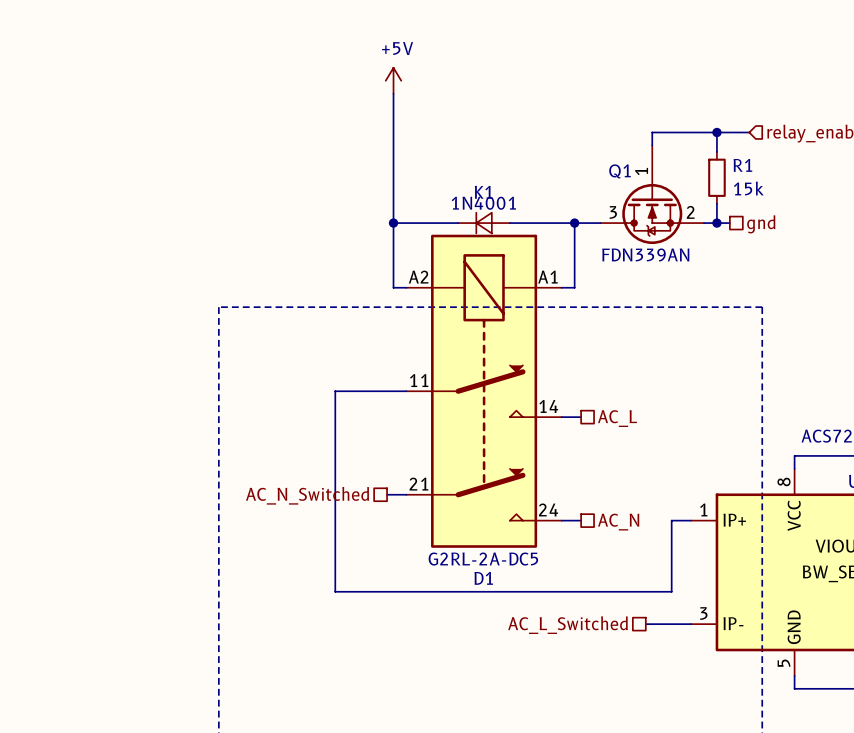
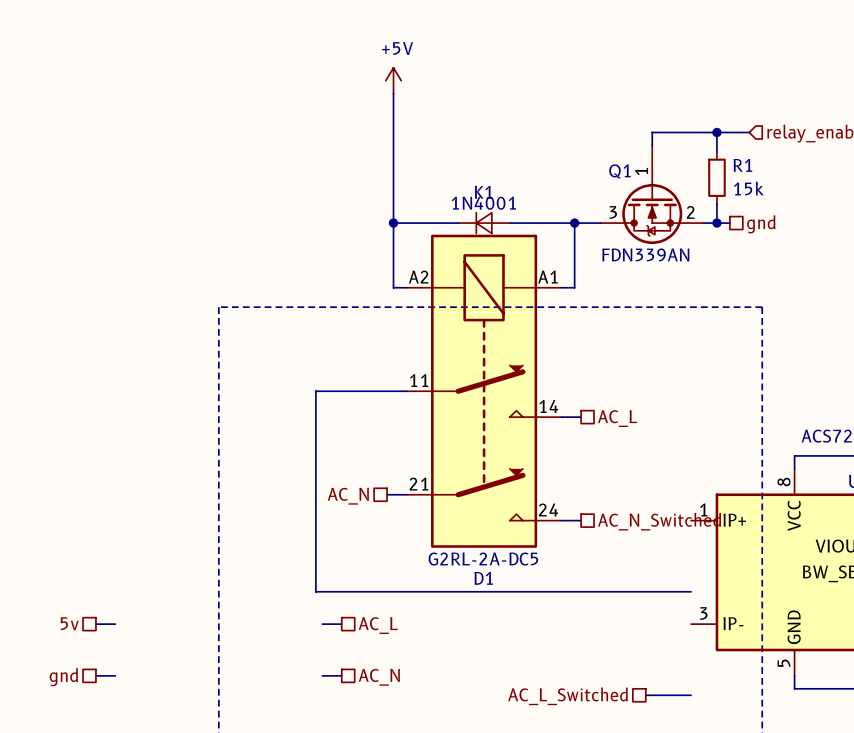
wire: (335, 391) (335, 591) -> (335, 391) (315, 391) (315, 591) (335, 591)
hierarchical label: AC_N_Switched (307, 495) -> AC_N (348, 496)
wire: (691, 520) (671, 520) (671, 591) -> (691, 591) (671, 591)
hierarchical label: AC_N (618, 522) -> AC_N_Switched (659, 521)
hierarchical label: none -> 5v (69, 623)
wire: none -> (95, 624) (115, 624)
wire: none -> (322, 624) (341, 624)
wire: (645, 624) (691, 624) -> (645, 695) (691, 695)
hierarchical label: none -> AC_L (378, 625)
hierarchical label position: AC_L_Switched (568, 625) -> AC_L_Switched (568, 696)
wire: none -> (95, 675) (115, 675)
wire: none -> (322, 675) (341, 675)
hierarchical label: none -> gnd (63, 677)
hierarchical label: none -> AC_N (379, 677)

